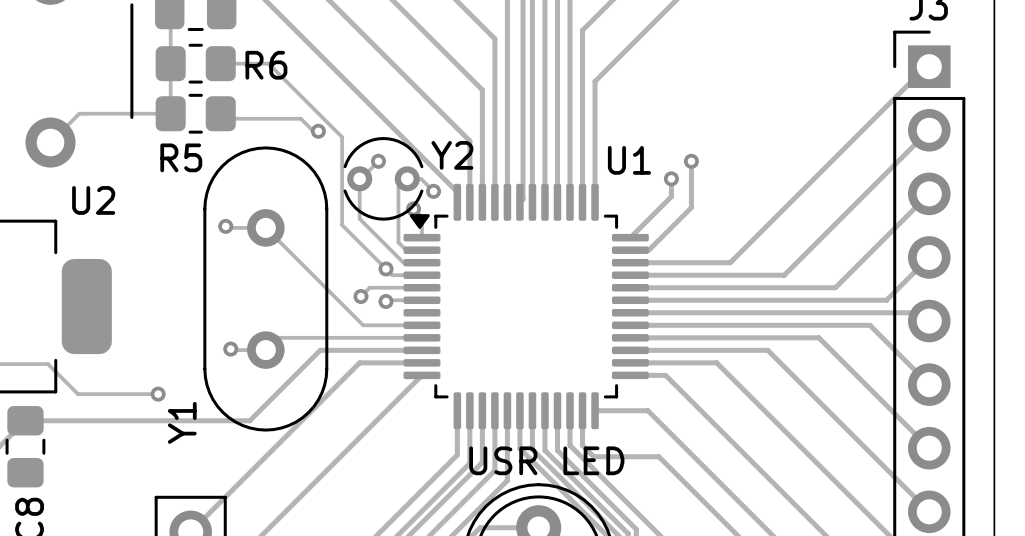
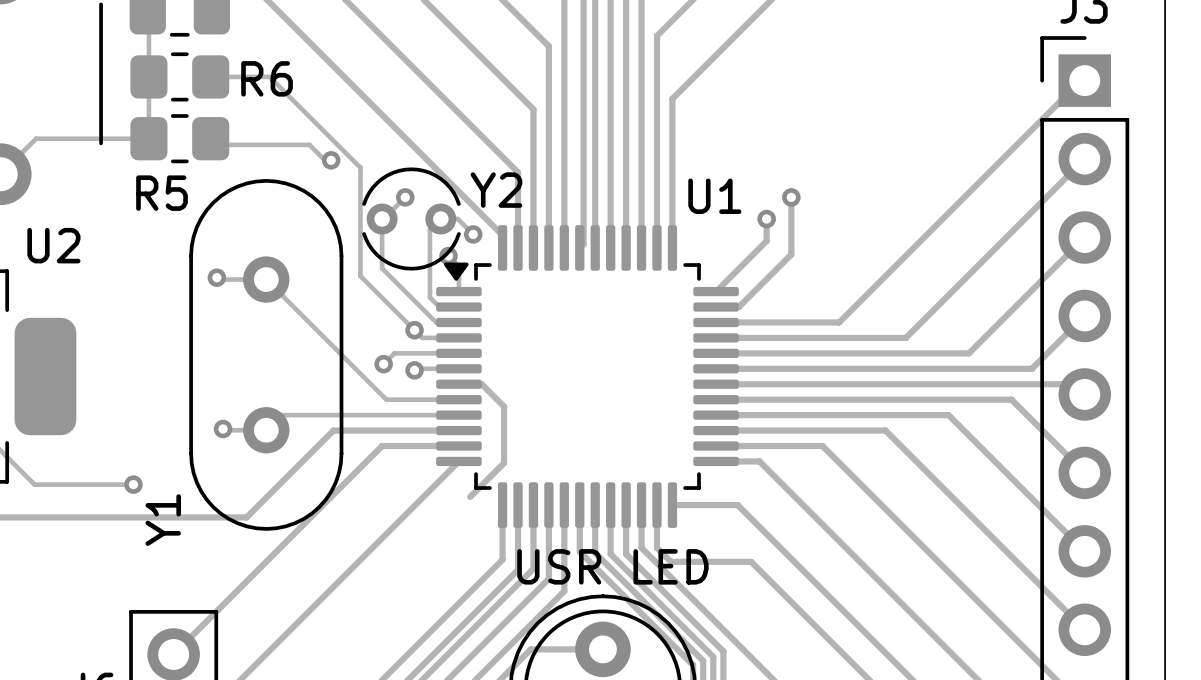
track: none -> (458, 384) (481, 384) (504, 406) (504, 463) (470, 496)

